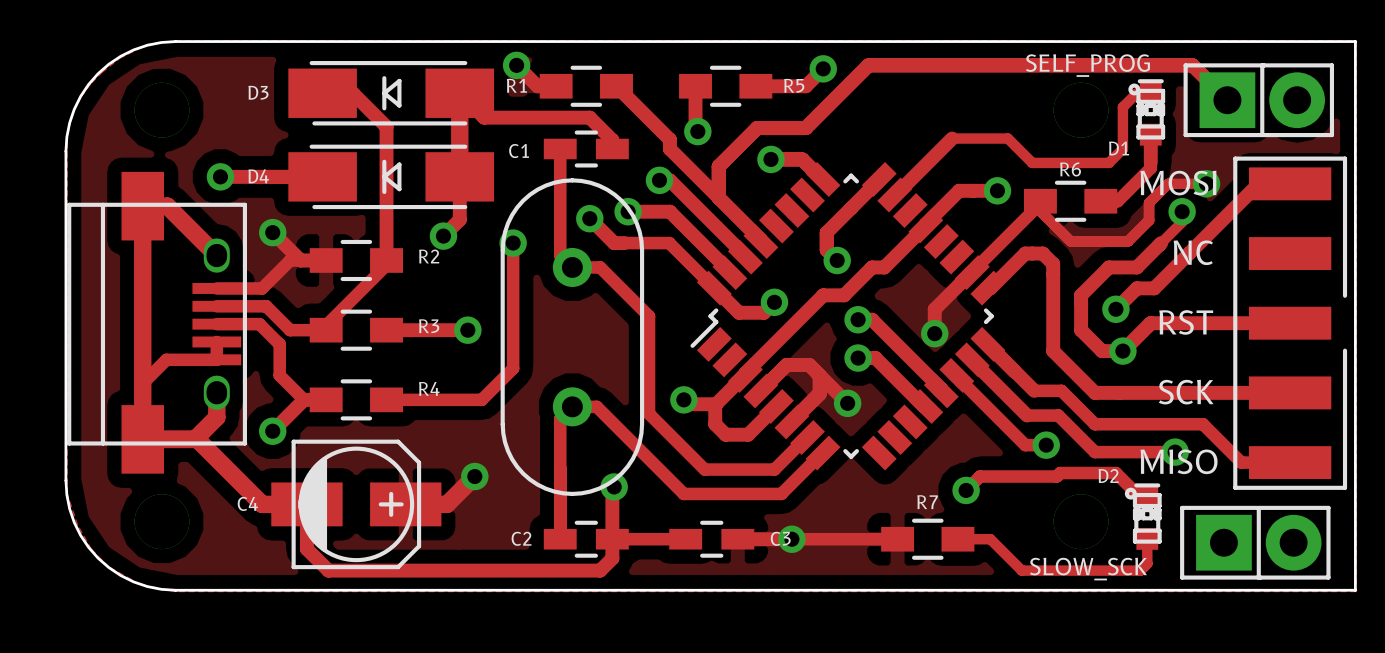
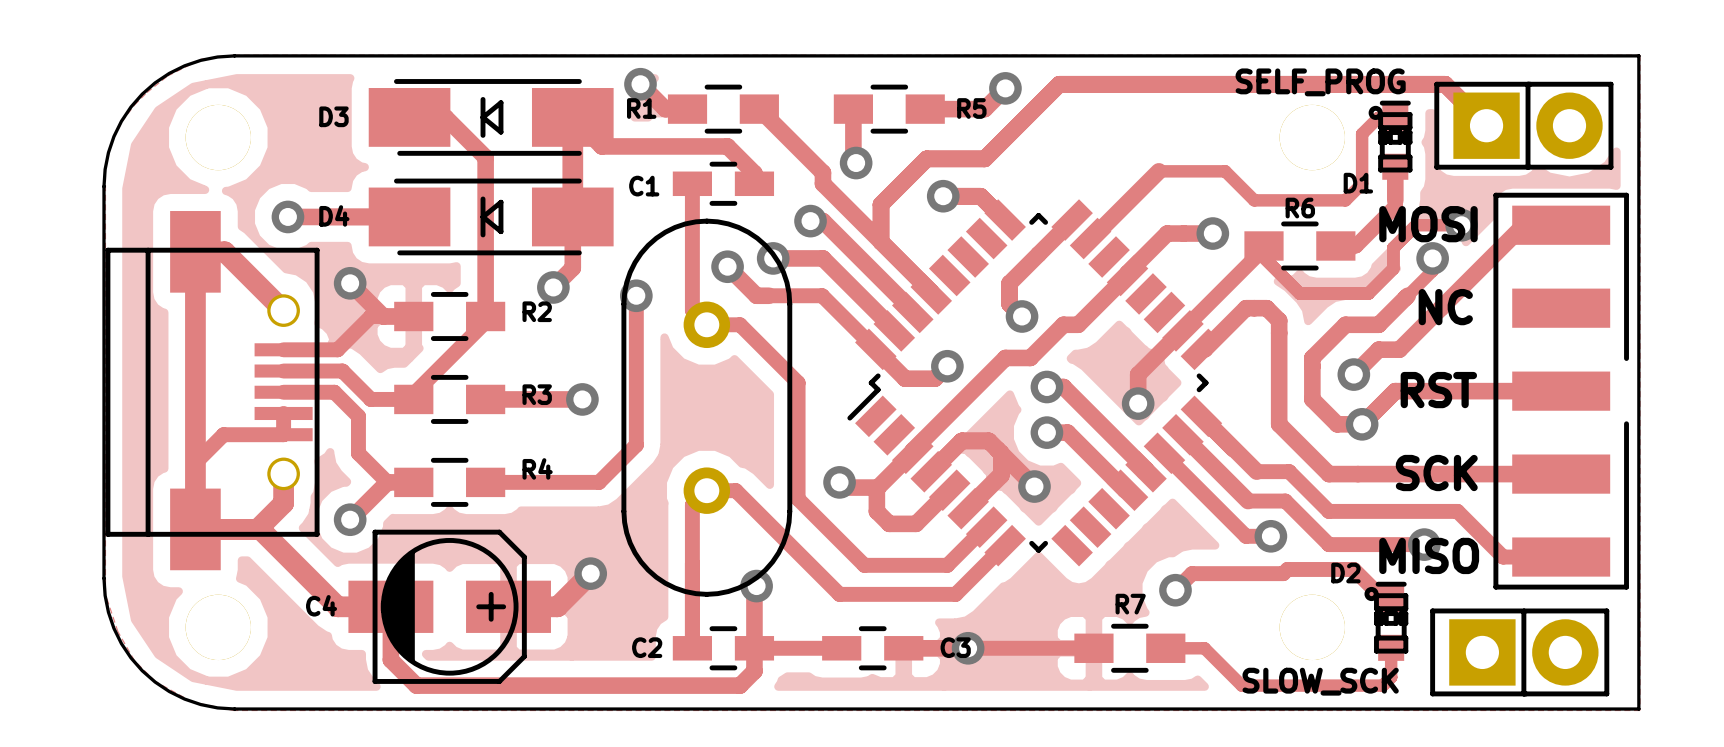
part footprint: [67, 171, 248, 474] -> [105, 211, 320, 571]

